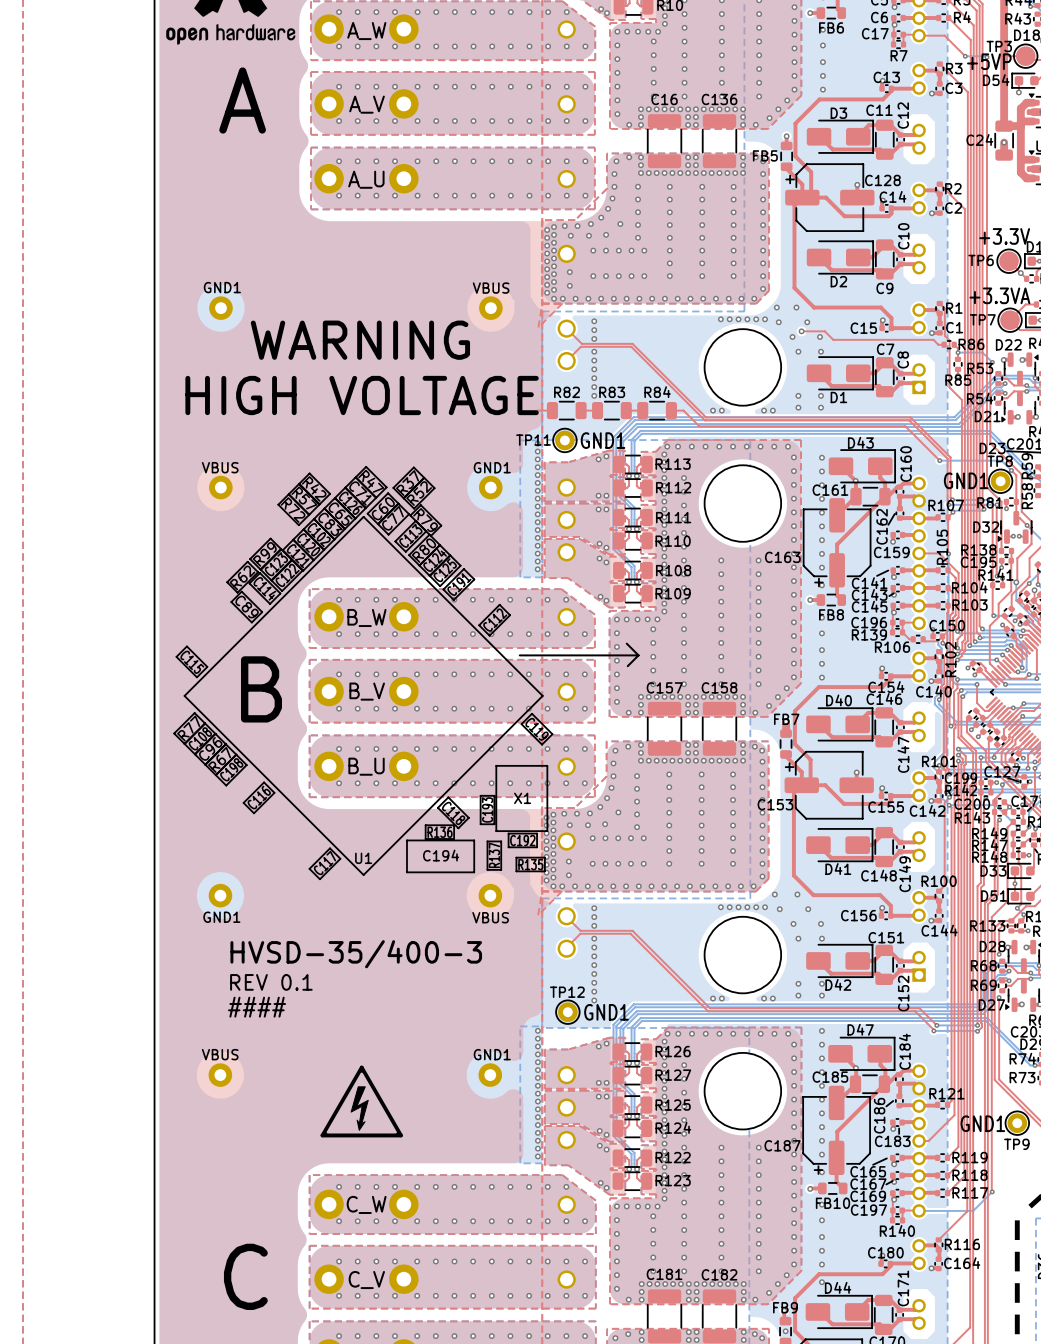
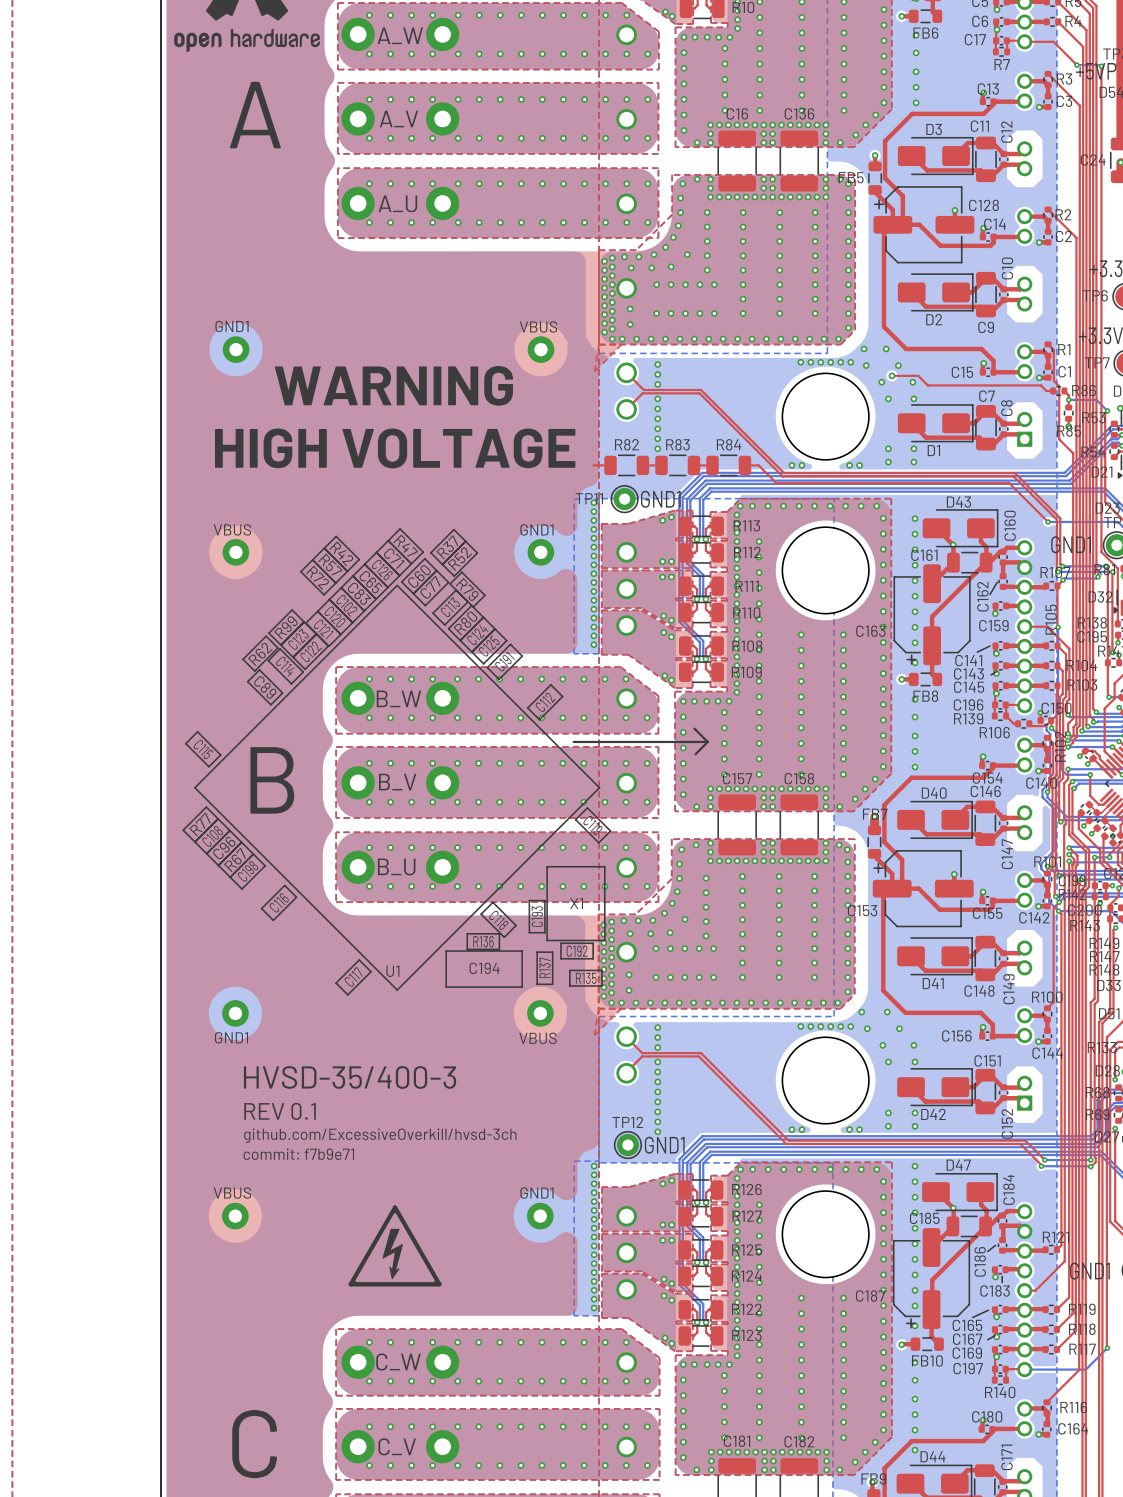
text: none -> github.com/ExcessiveOverkill/hvsd-3ch (380, 1135)
text: #### (257, 1007) -> none
text: none -> commit: f7b9e71 (298, 1154)

